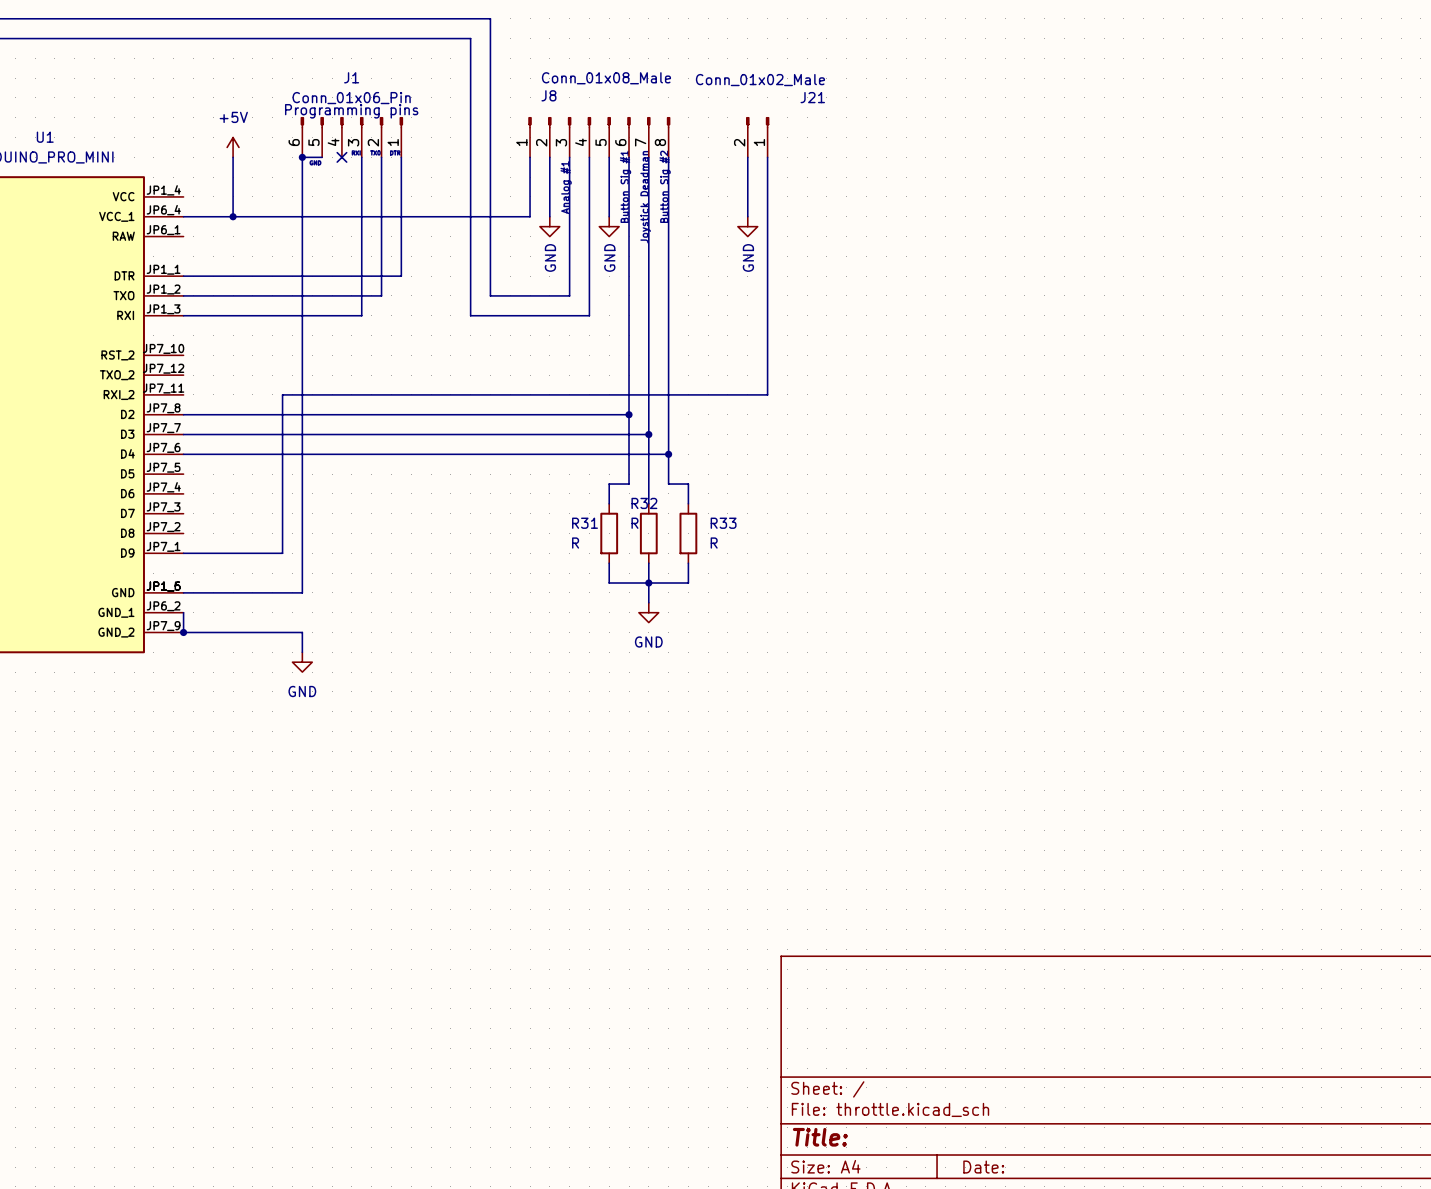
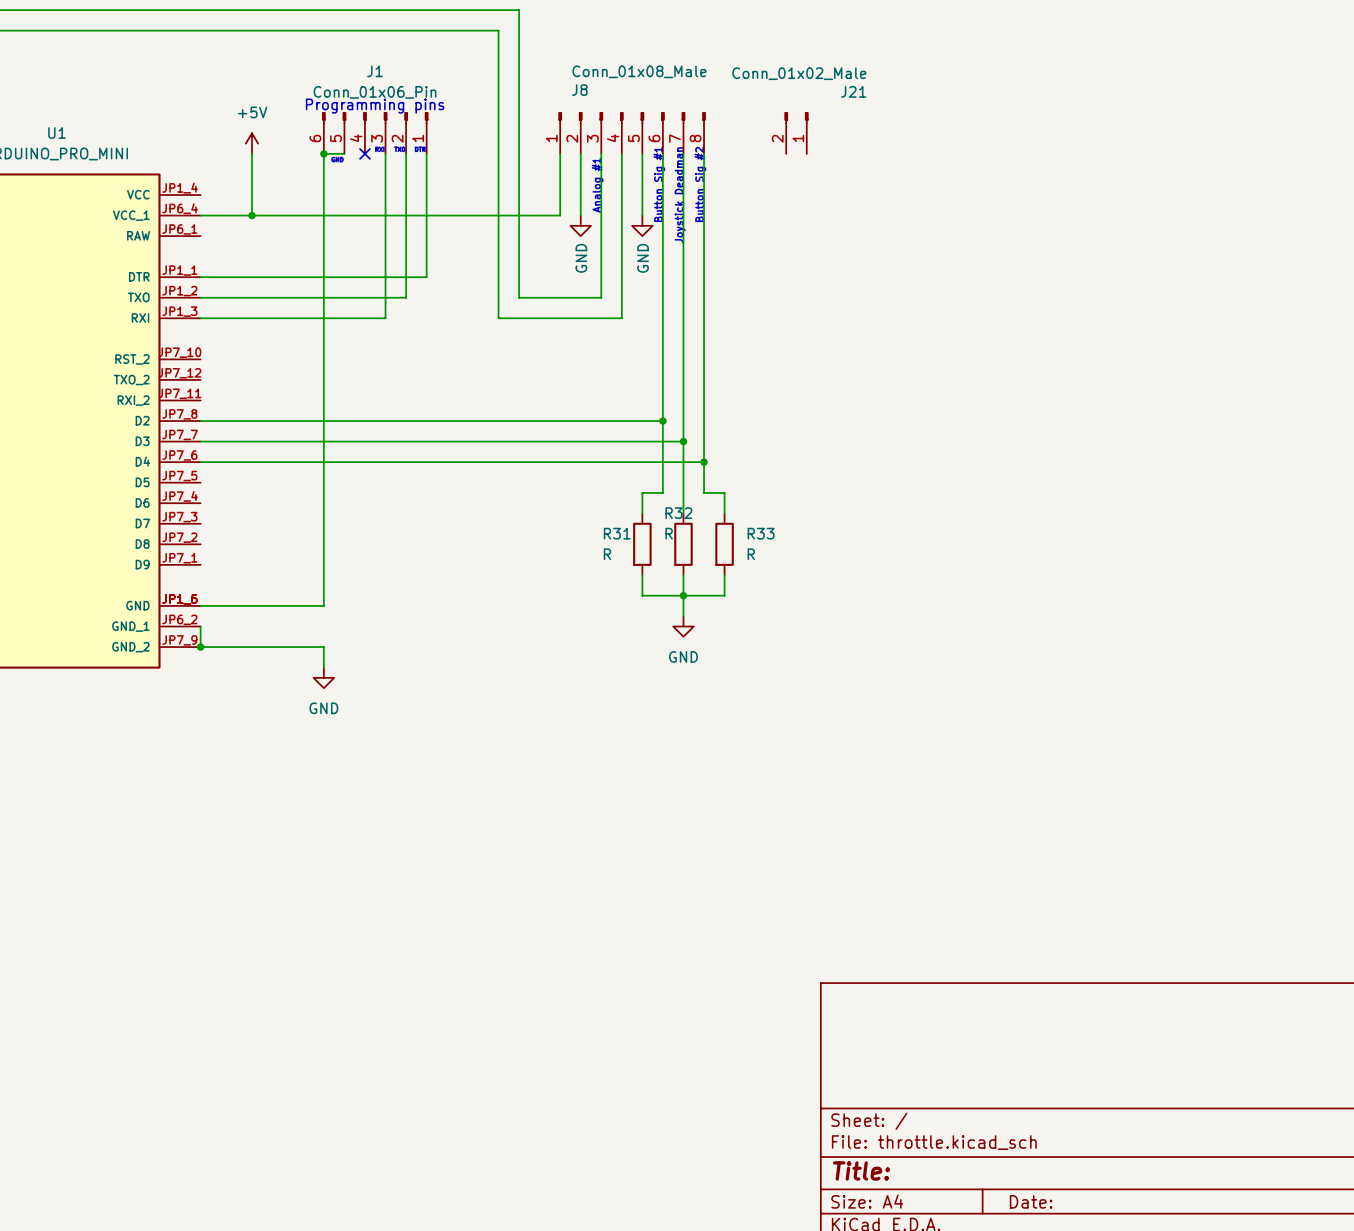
wire: (747, 157) (747, 216) -> none
wire: (767, 157) (767, 394) (282, 394) (282, 553) (183, 553) -> none
power symbol: GND (747, 226) -> none

